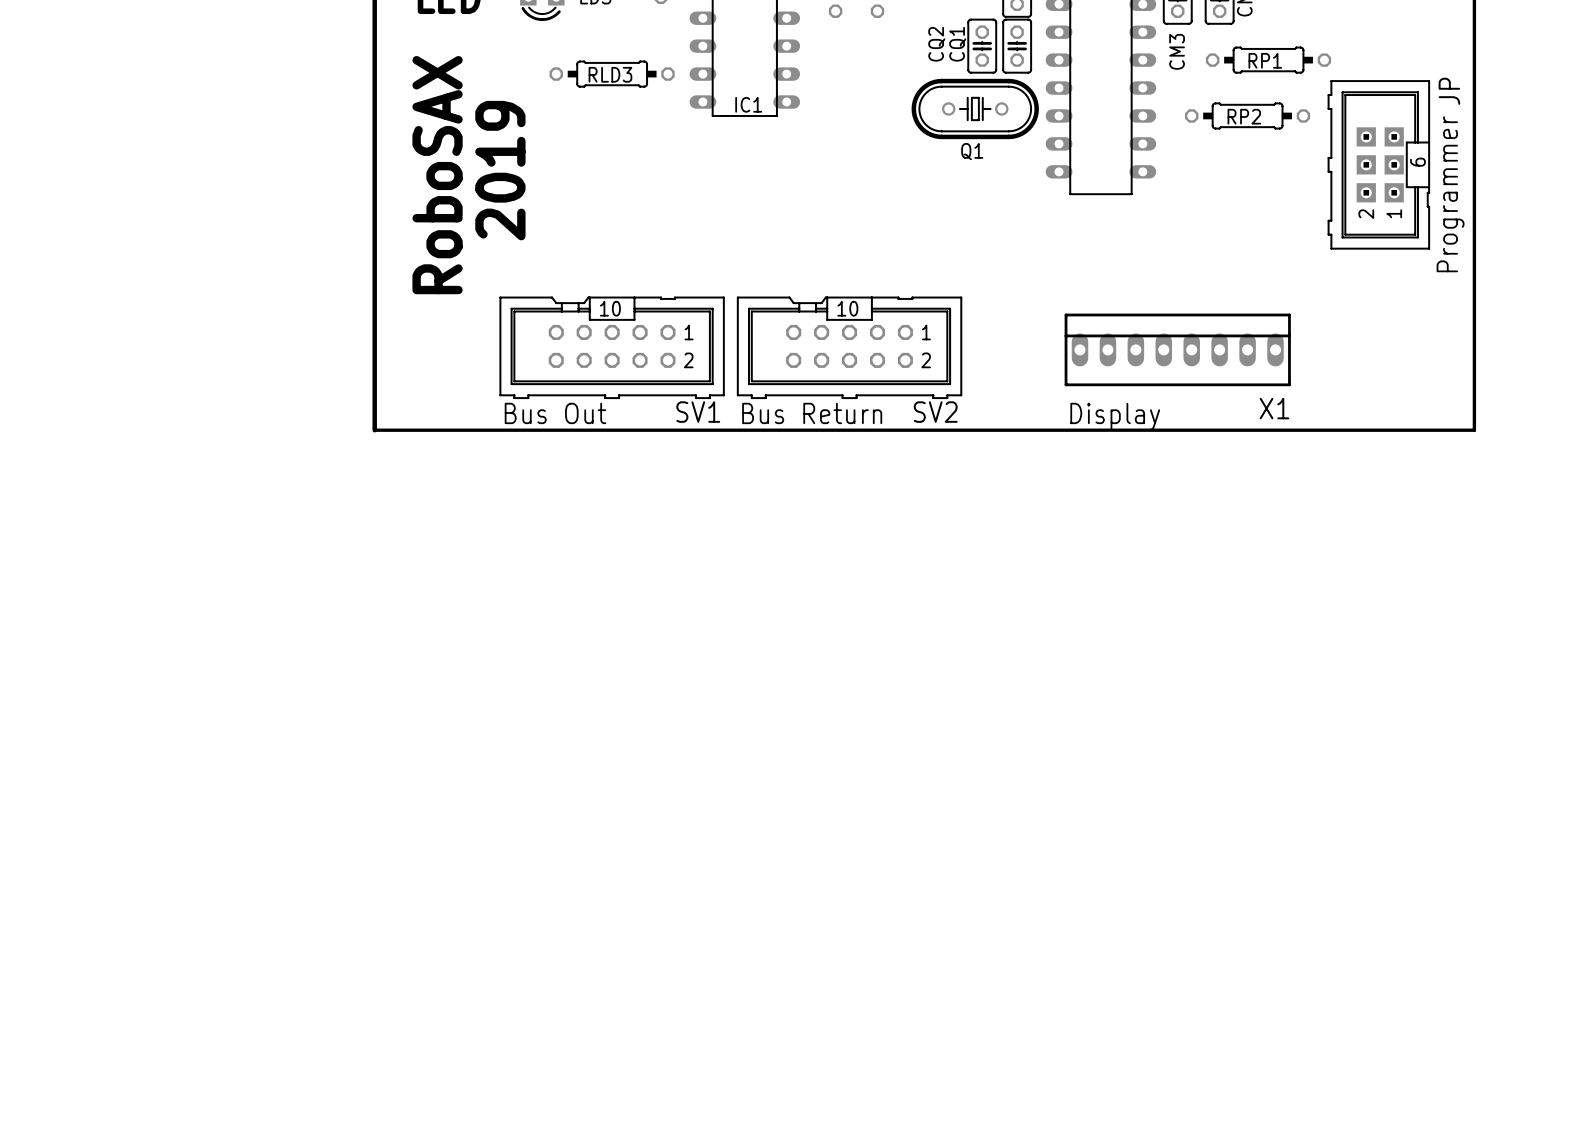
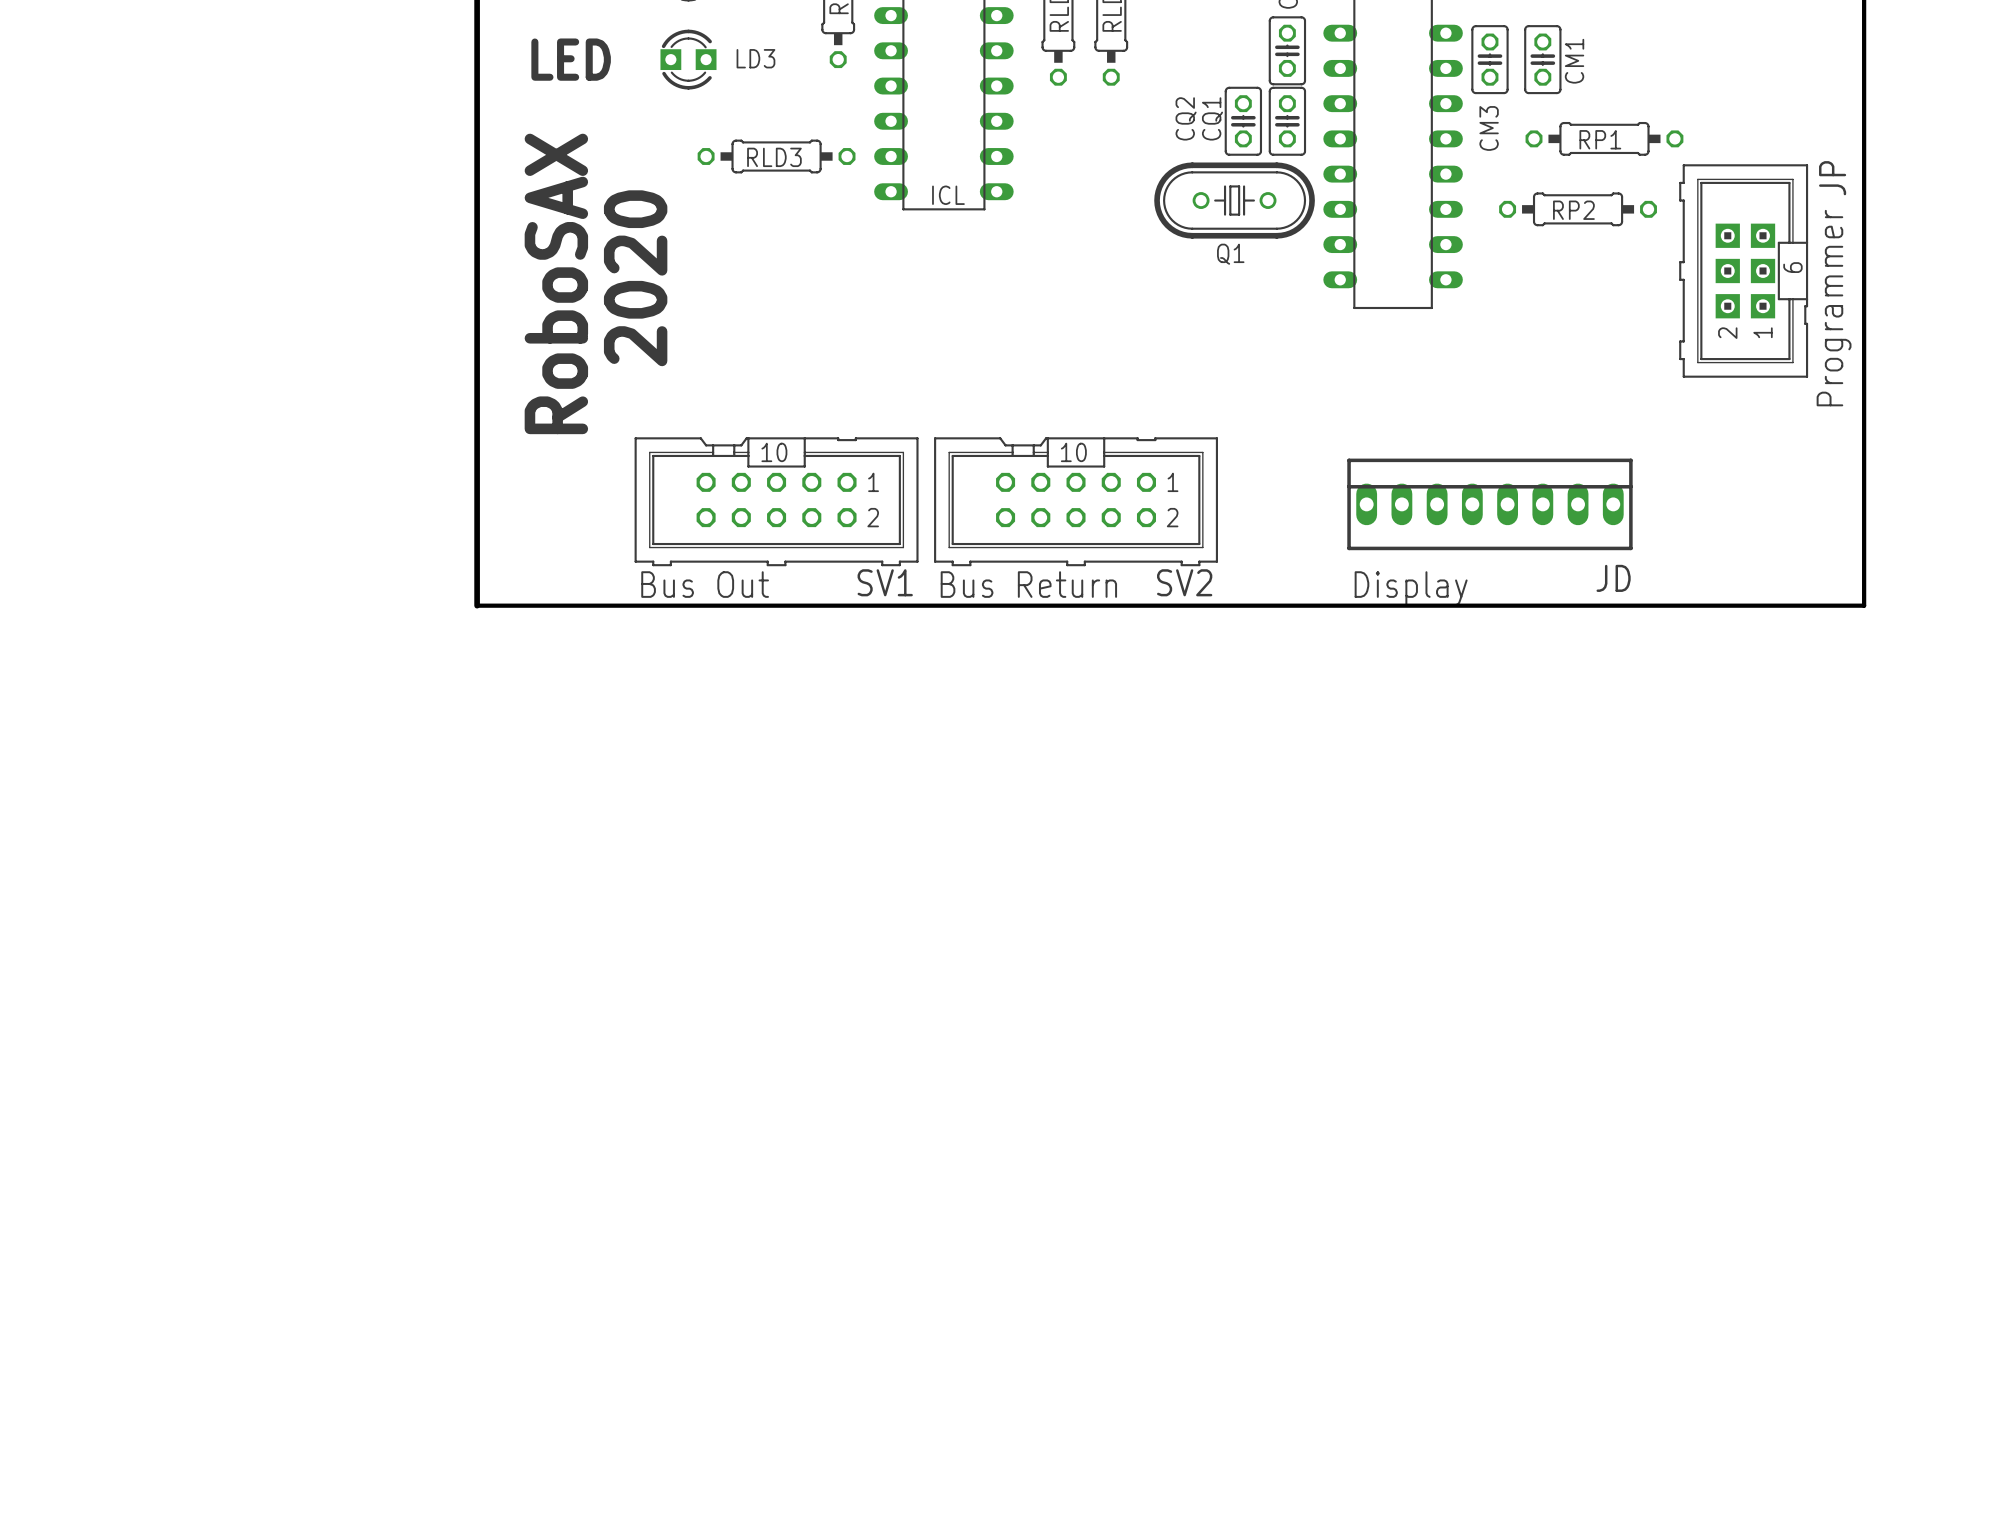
IC1 name: IC1 (748, 104) -> ICL (948, 195)
text: 2019 (500, 170) -> 2020 (635, 278)
X1 name: X1 (1274, 408) -> JD (1613, 578)

